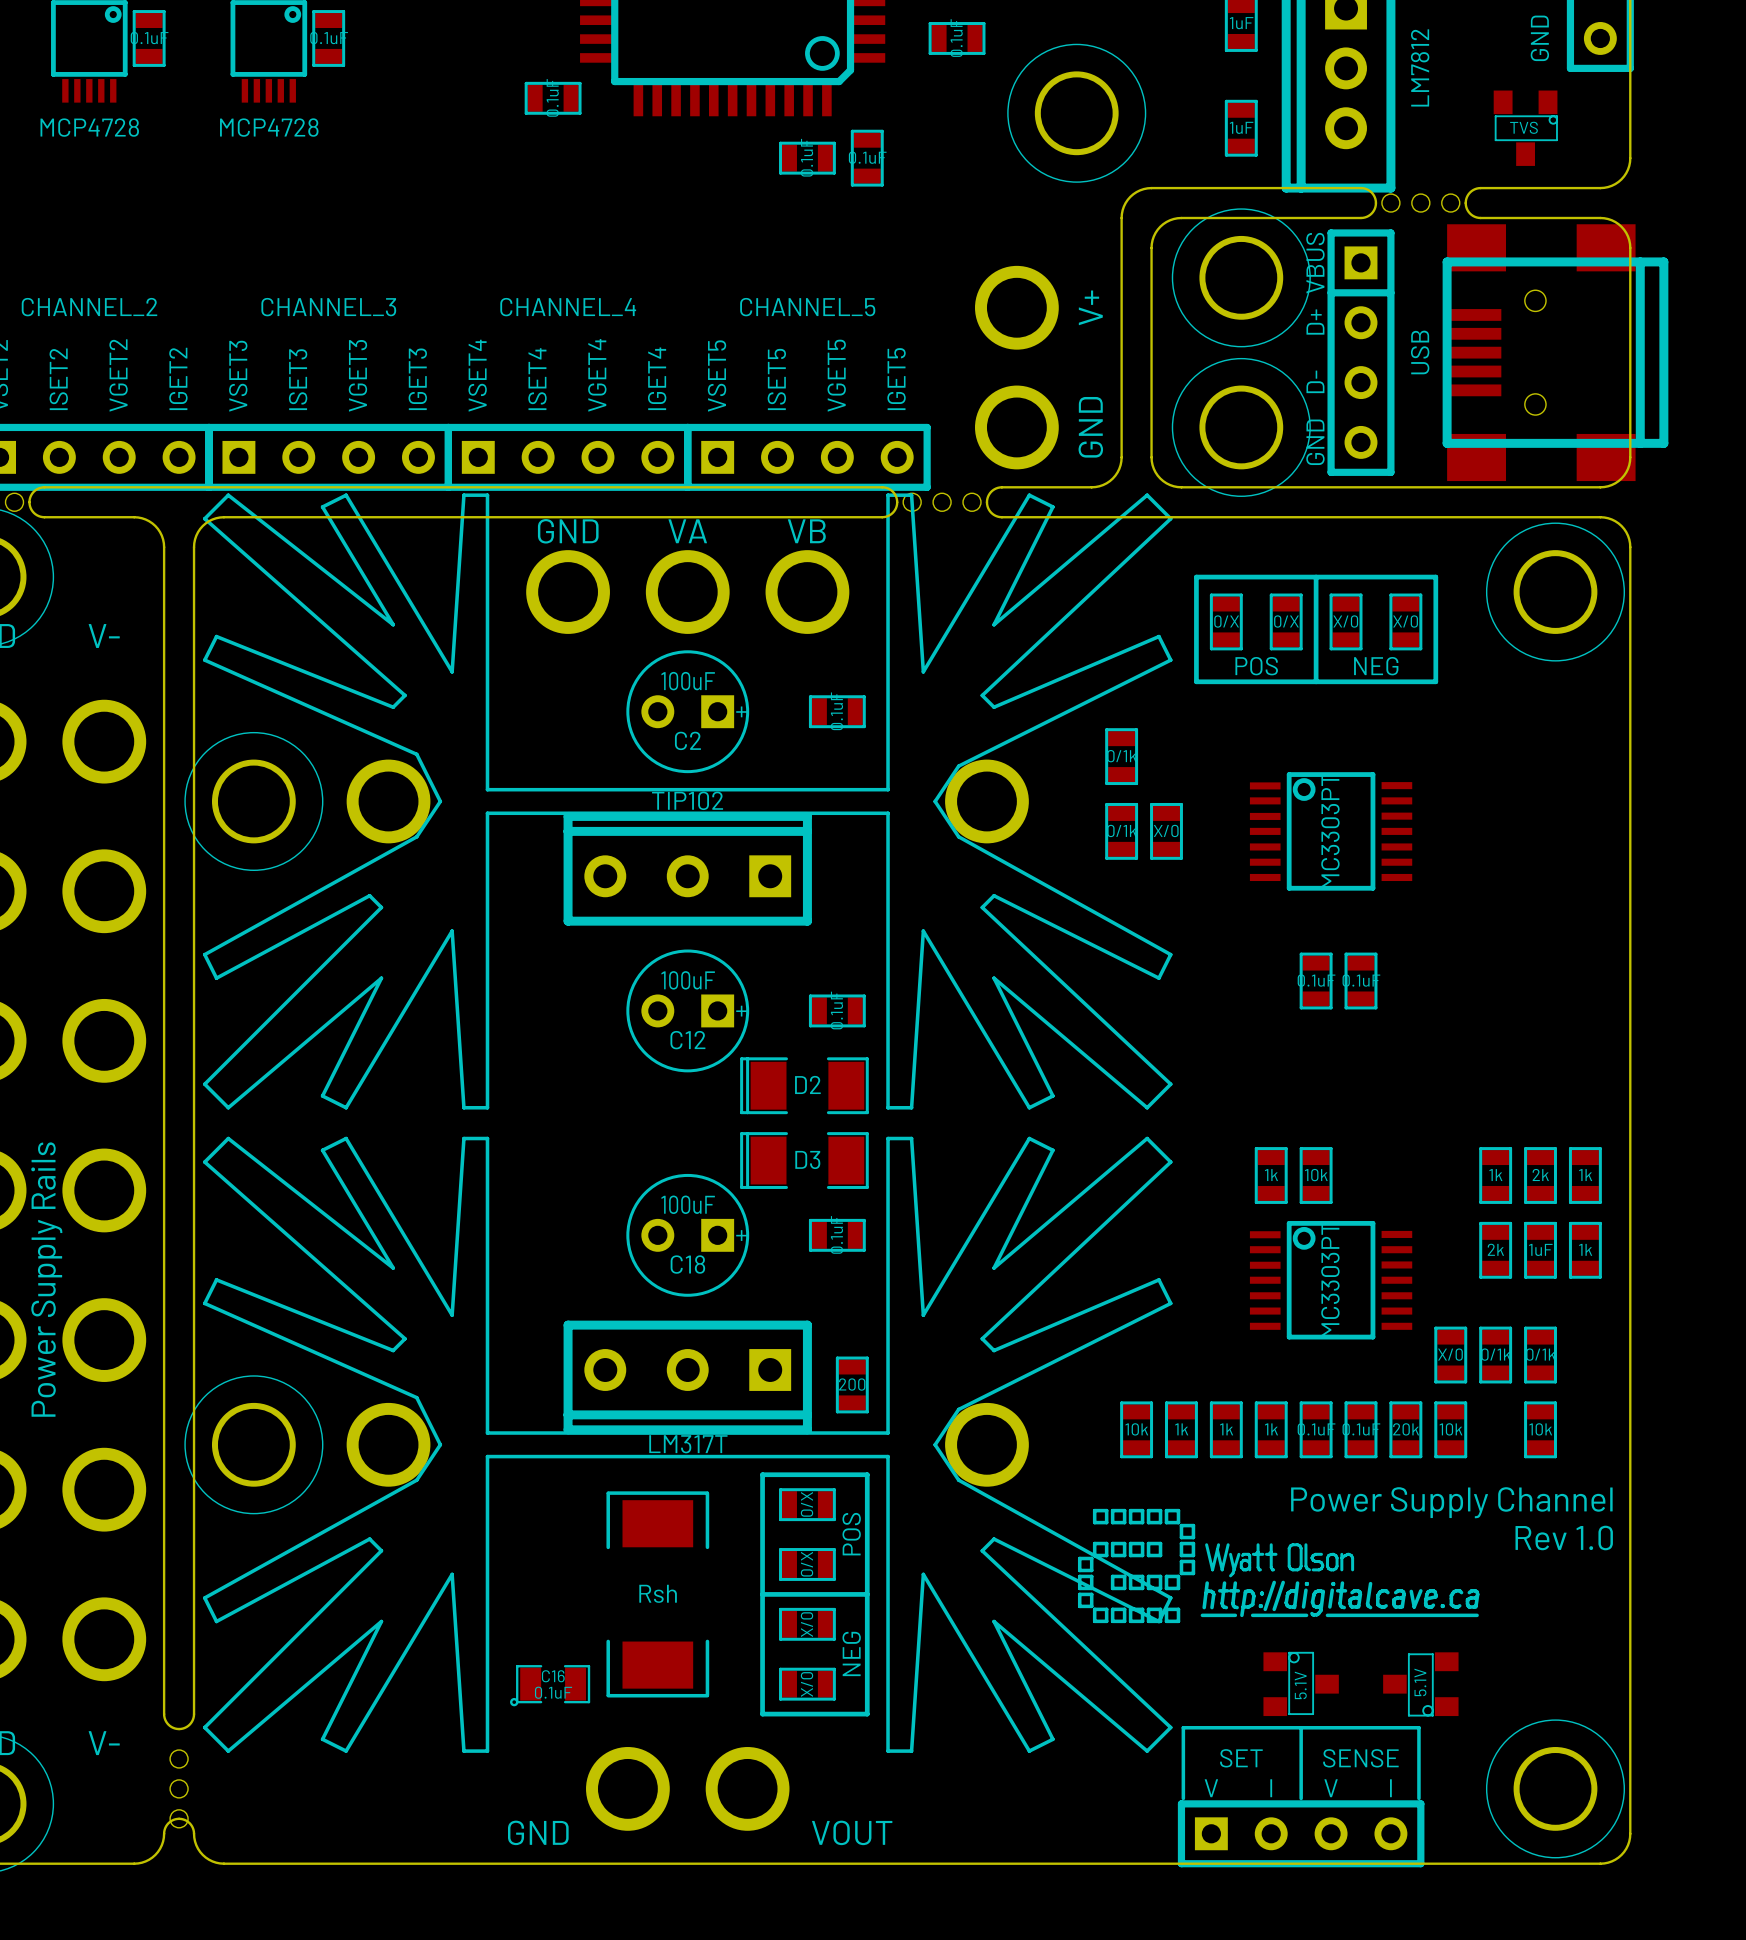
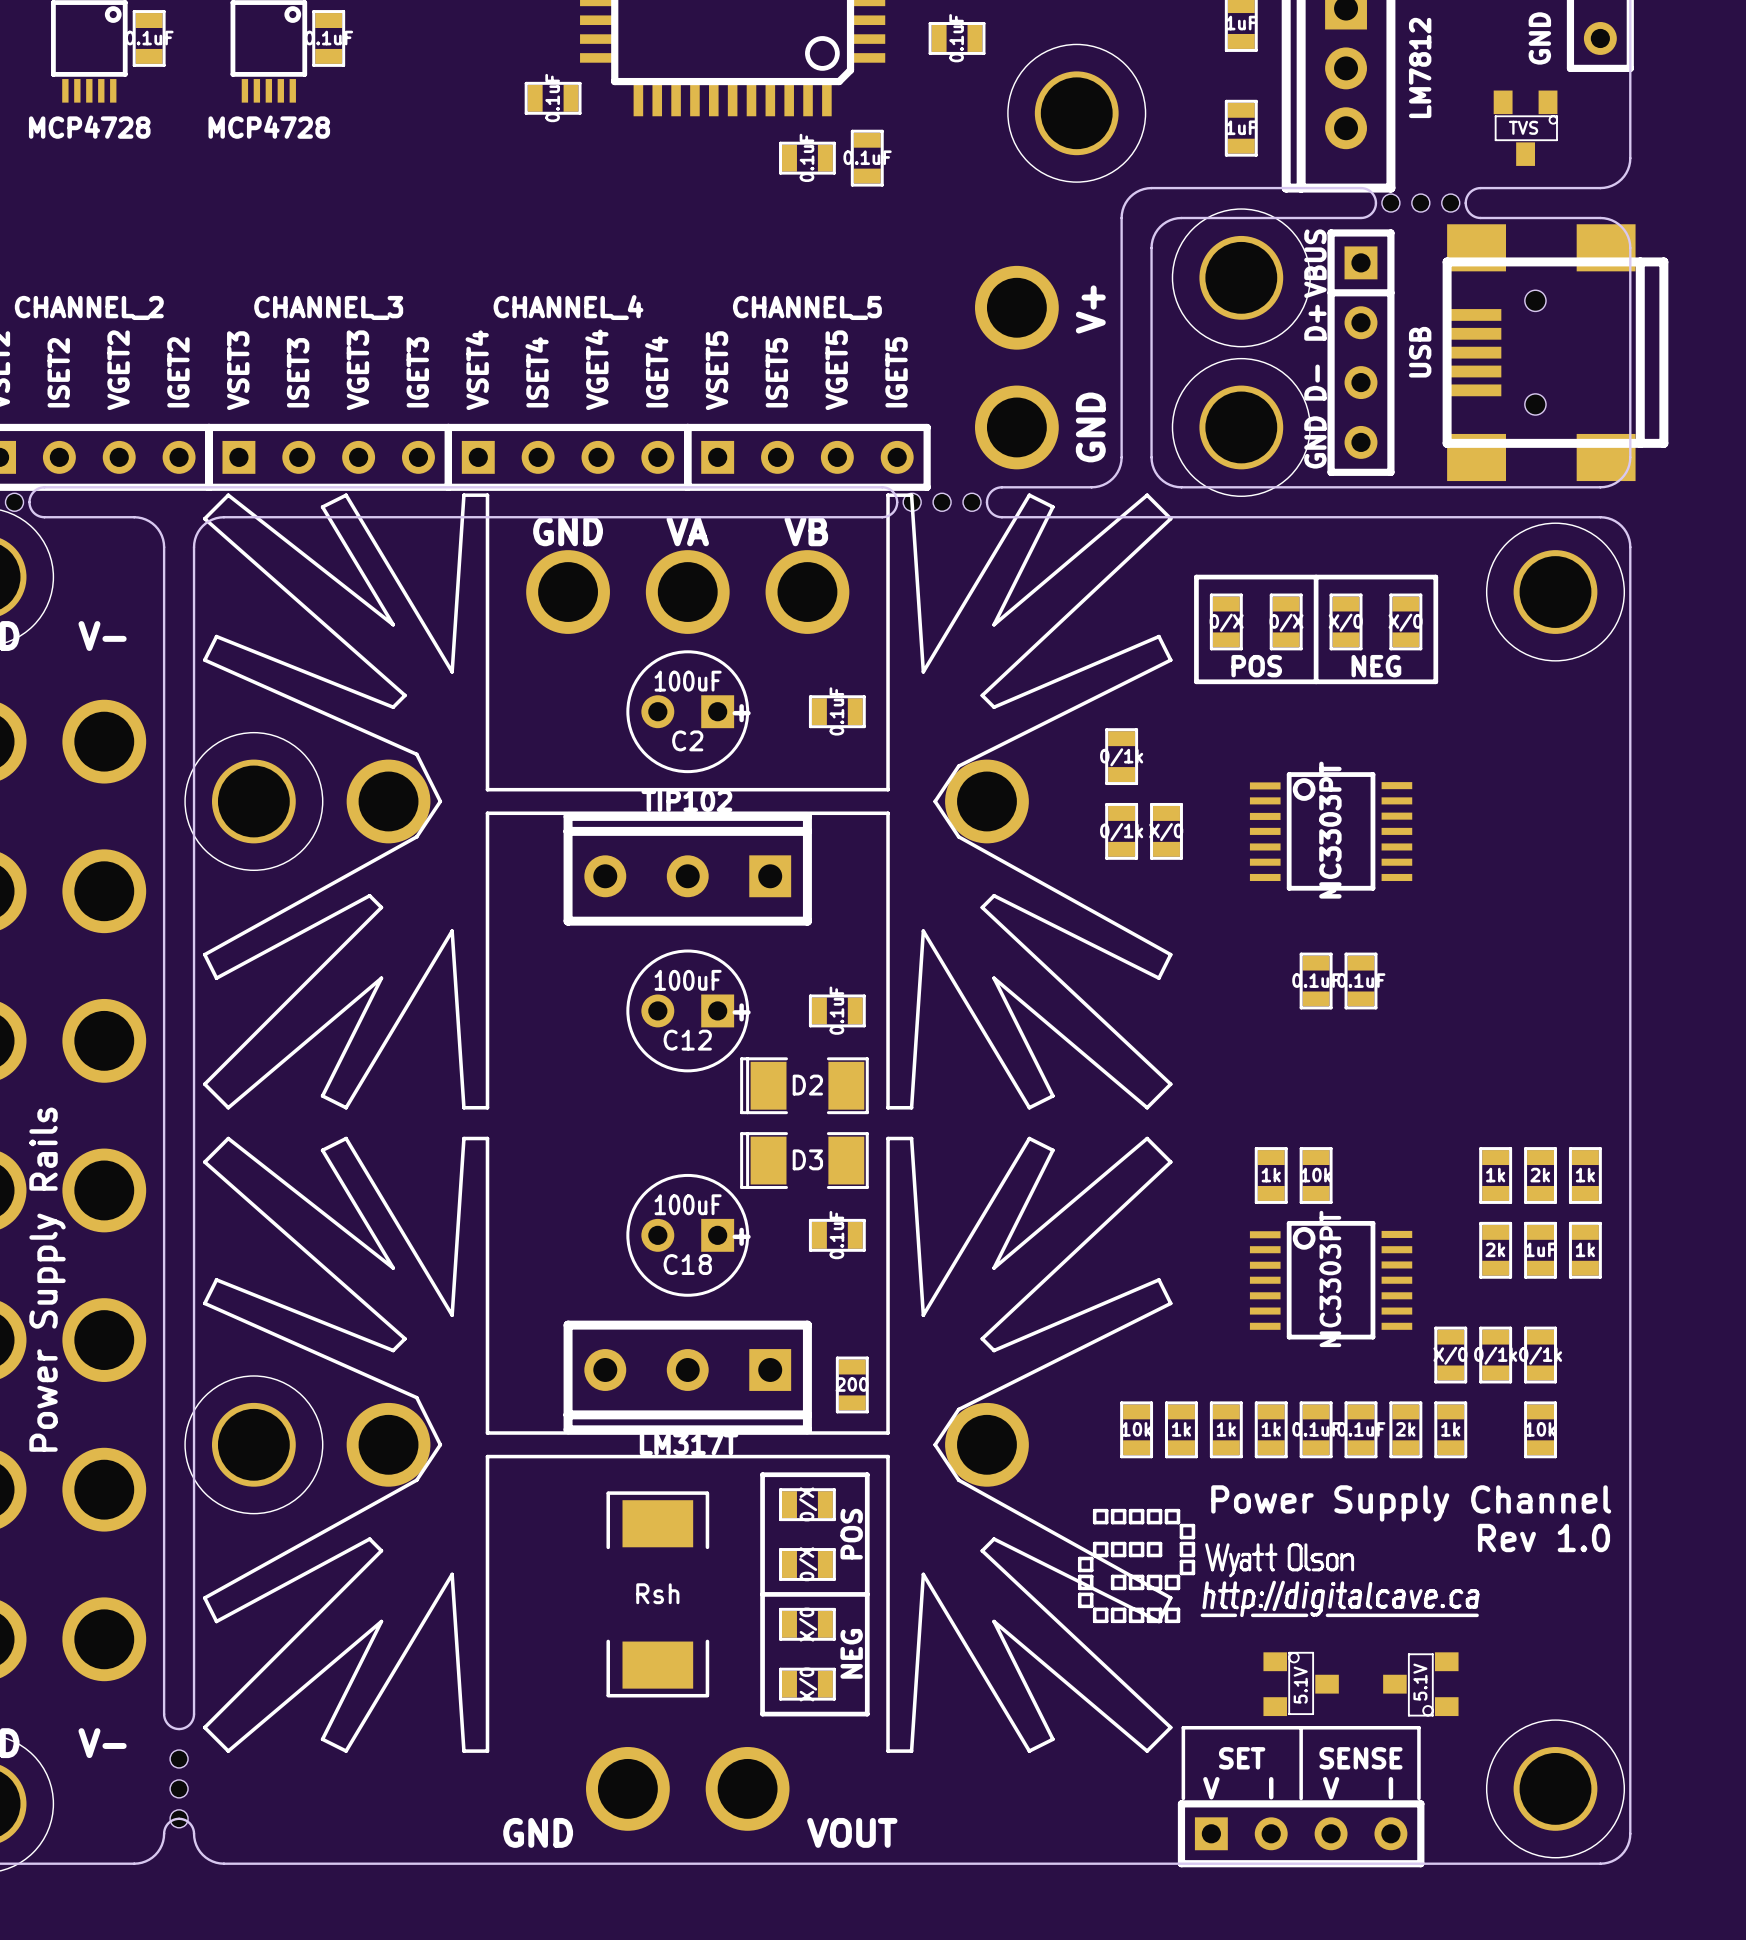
part value: 20k (1406, 1429) -> 2k (1405, 1429)
part value: 10k (1451, 1429) -> 1k (1450, 1429)
C16: 0.1uF (550, 1685) -> none

